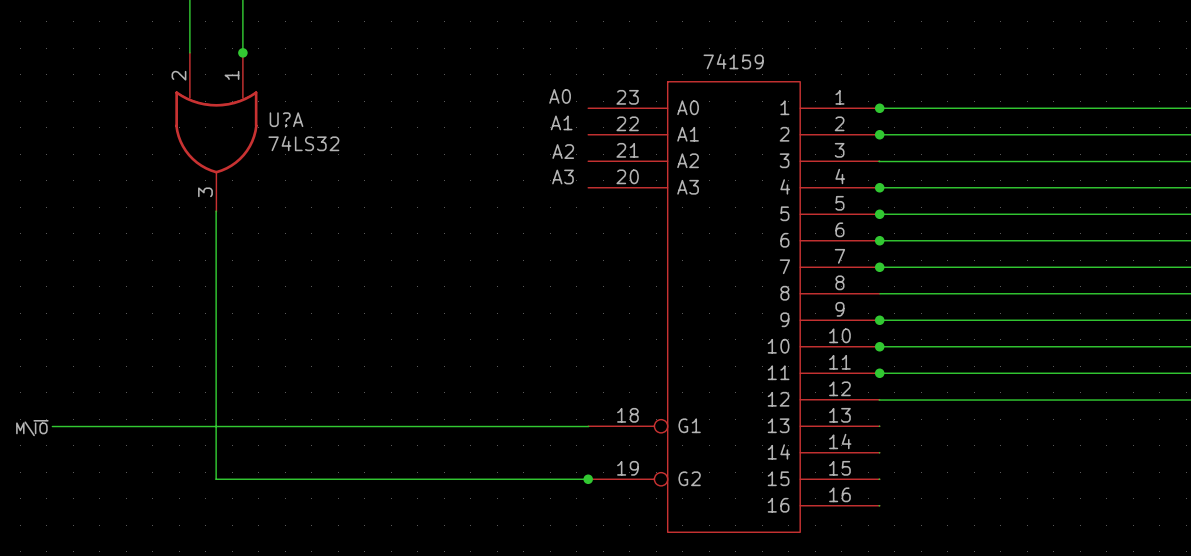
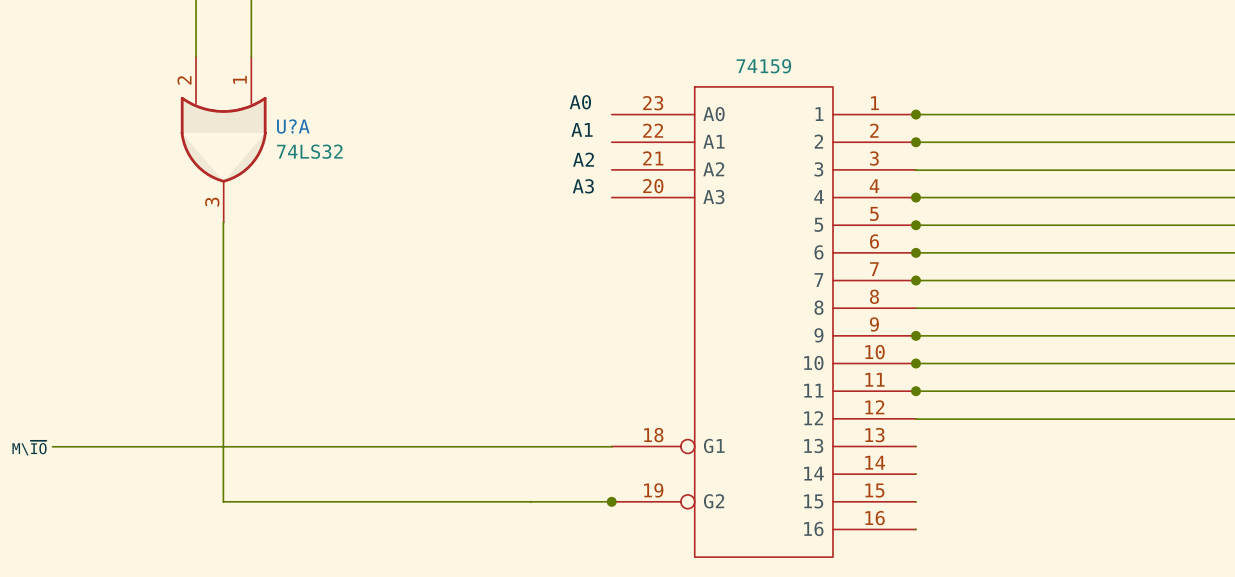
junction: (242, 52) -> none

